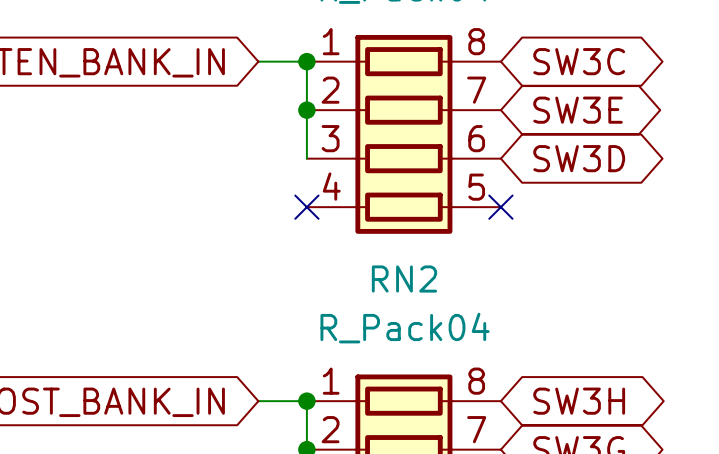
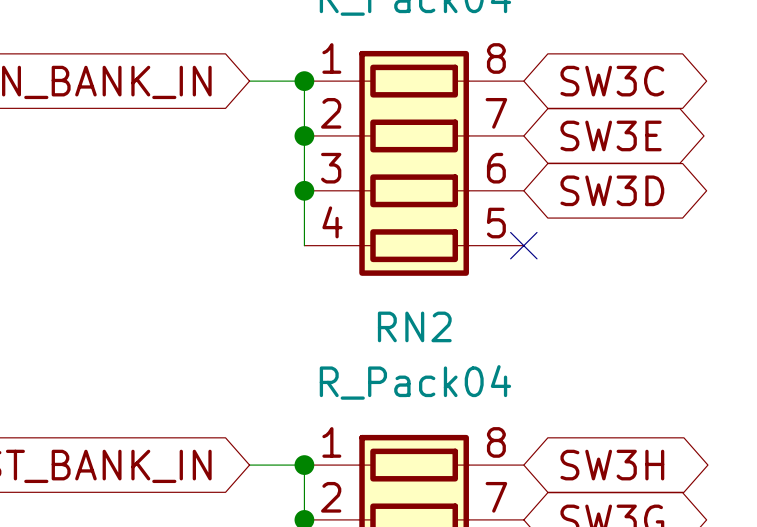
wire: none -> (304, 190) (304, 245)
junction: none -> (304, 190)
no-connect mark: (306, 207) -> none

